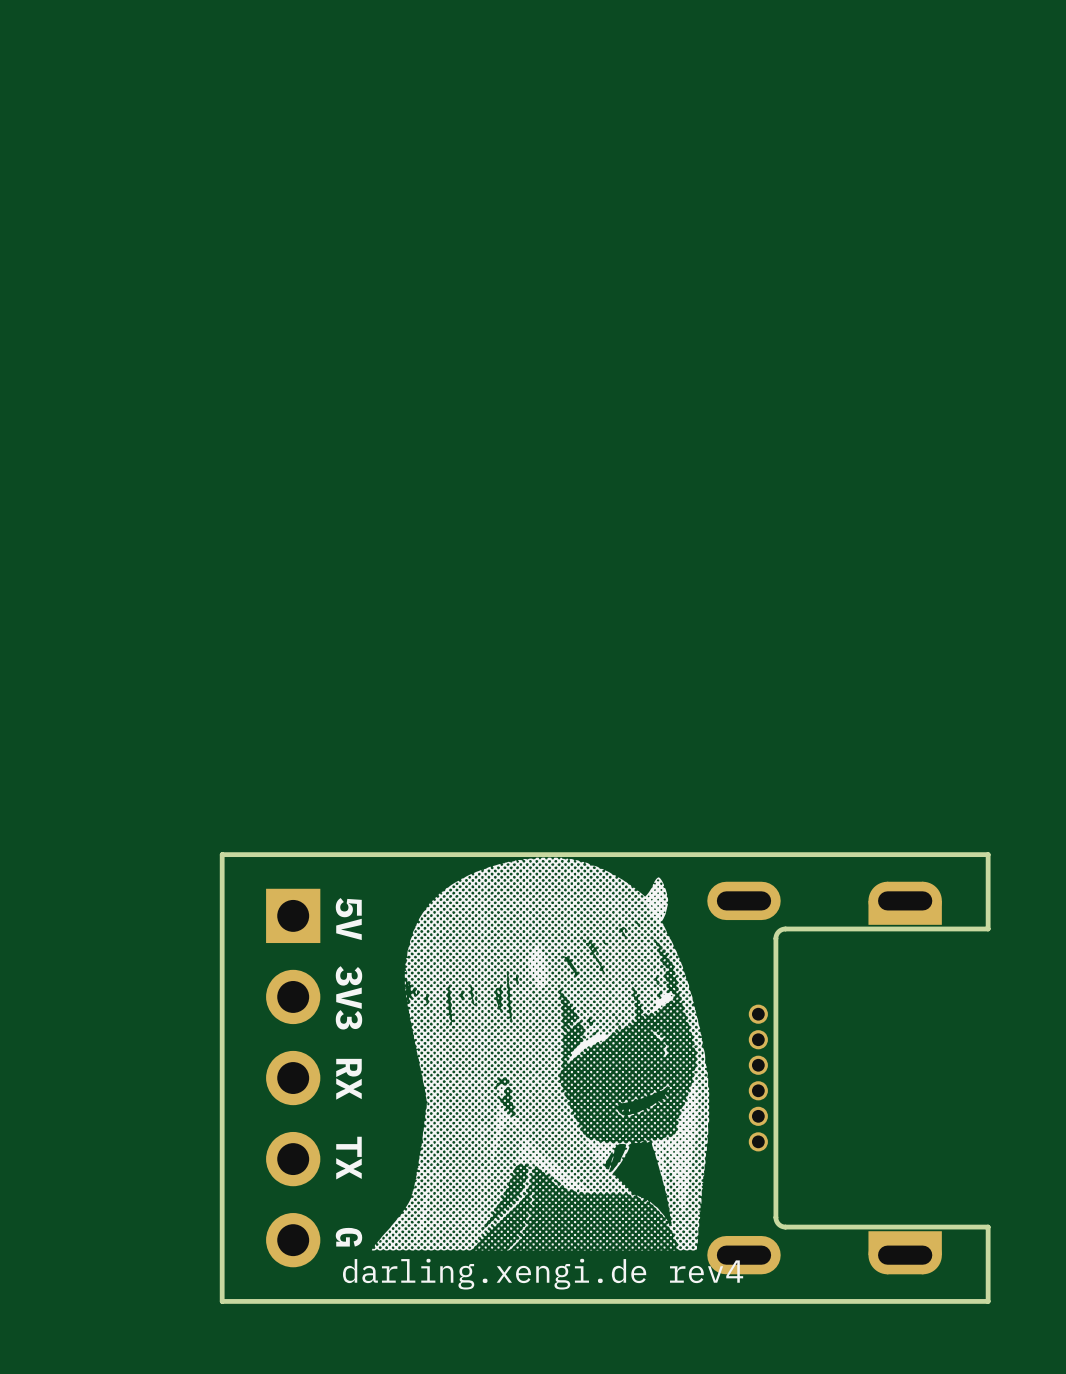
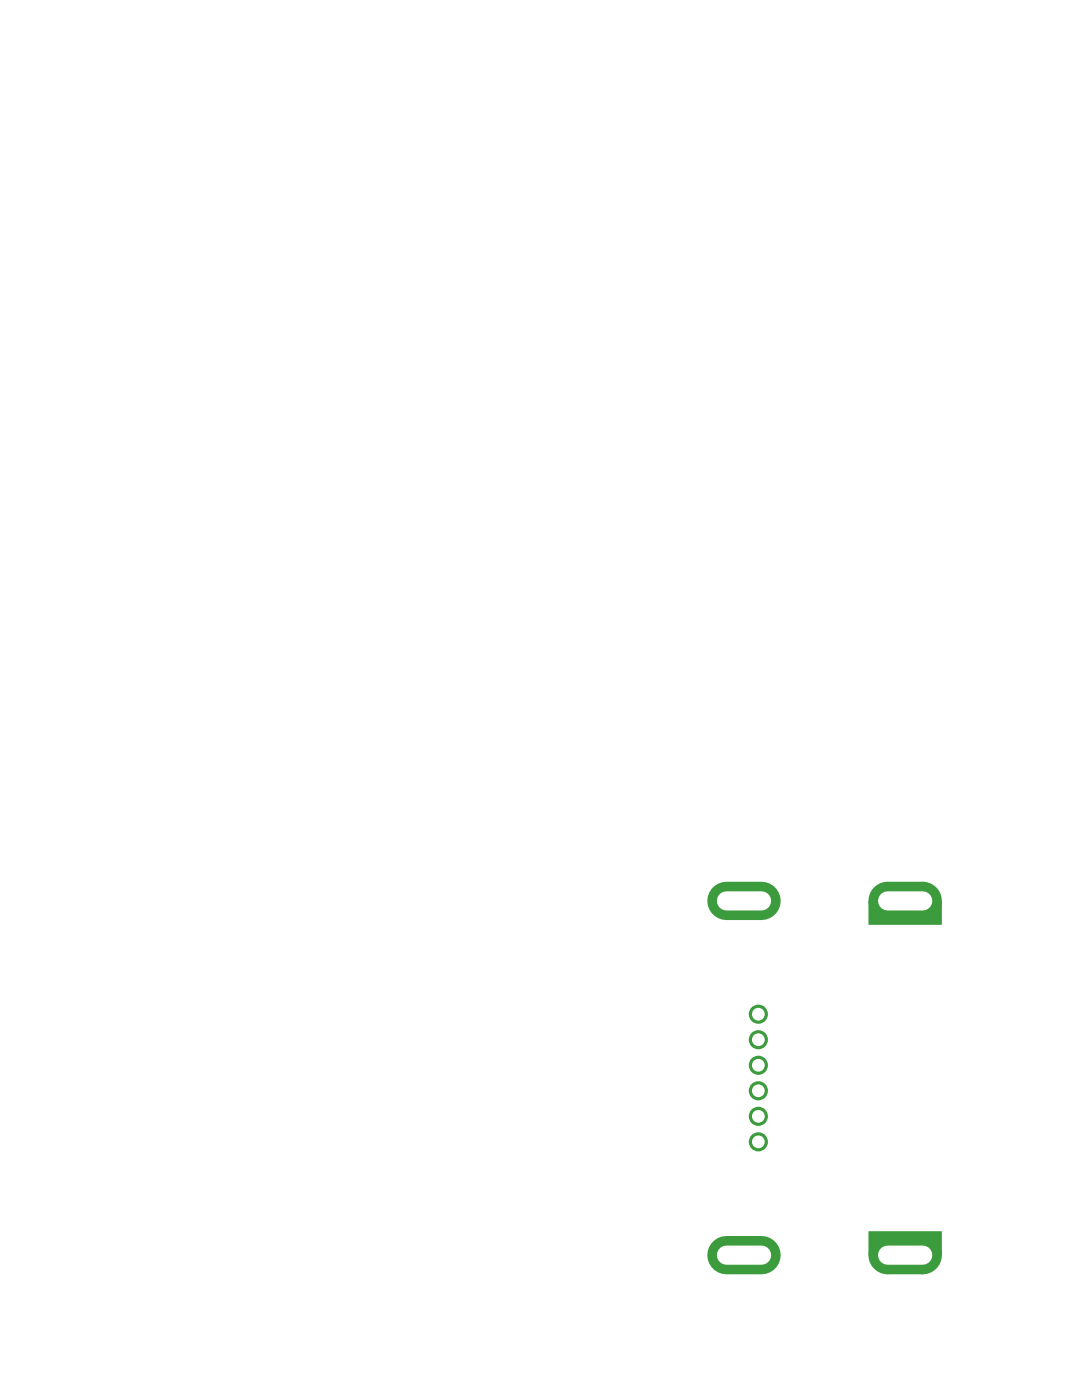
board edge: (988, 854) (988, 928) (785, 928) (778, 931) (775, 938) (777, 1222) (785, 1227) (988, 1227) (988, 1301) (222, 1301) (222, 854) (988, 854) -> none
drawing: [371, 857, 710, 1251] -> none
text: 5V (348, 919) -> none
text: 3V3 (348, 997) -> none
part: (293, 1078) -> none
text: RX (348, 1079) -> none
text: TX (348, 1158) -> none
text: G (348, 1237) -> none
text: darling.xengi.de rev4 (543, 1274) -> none

